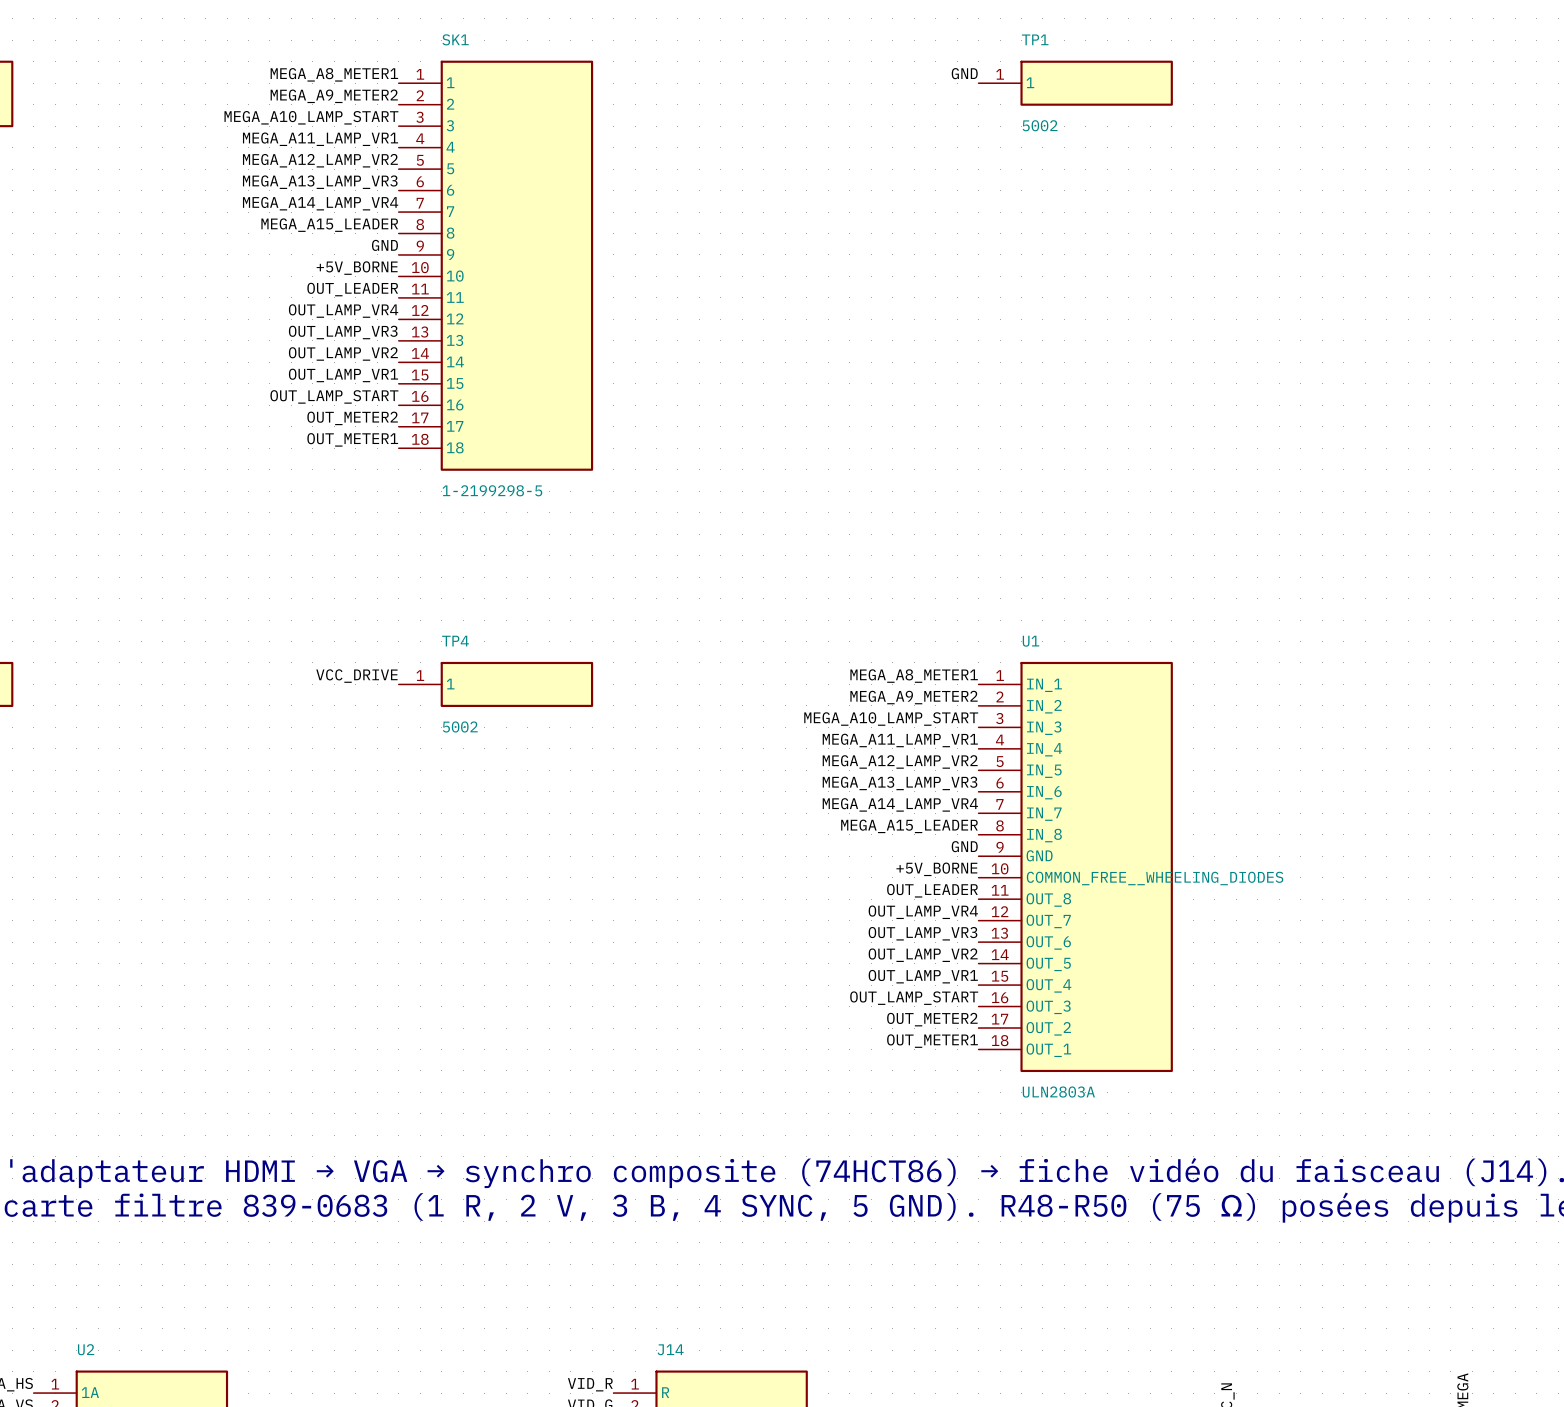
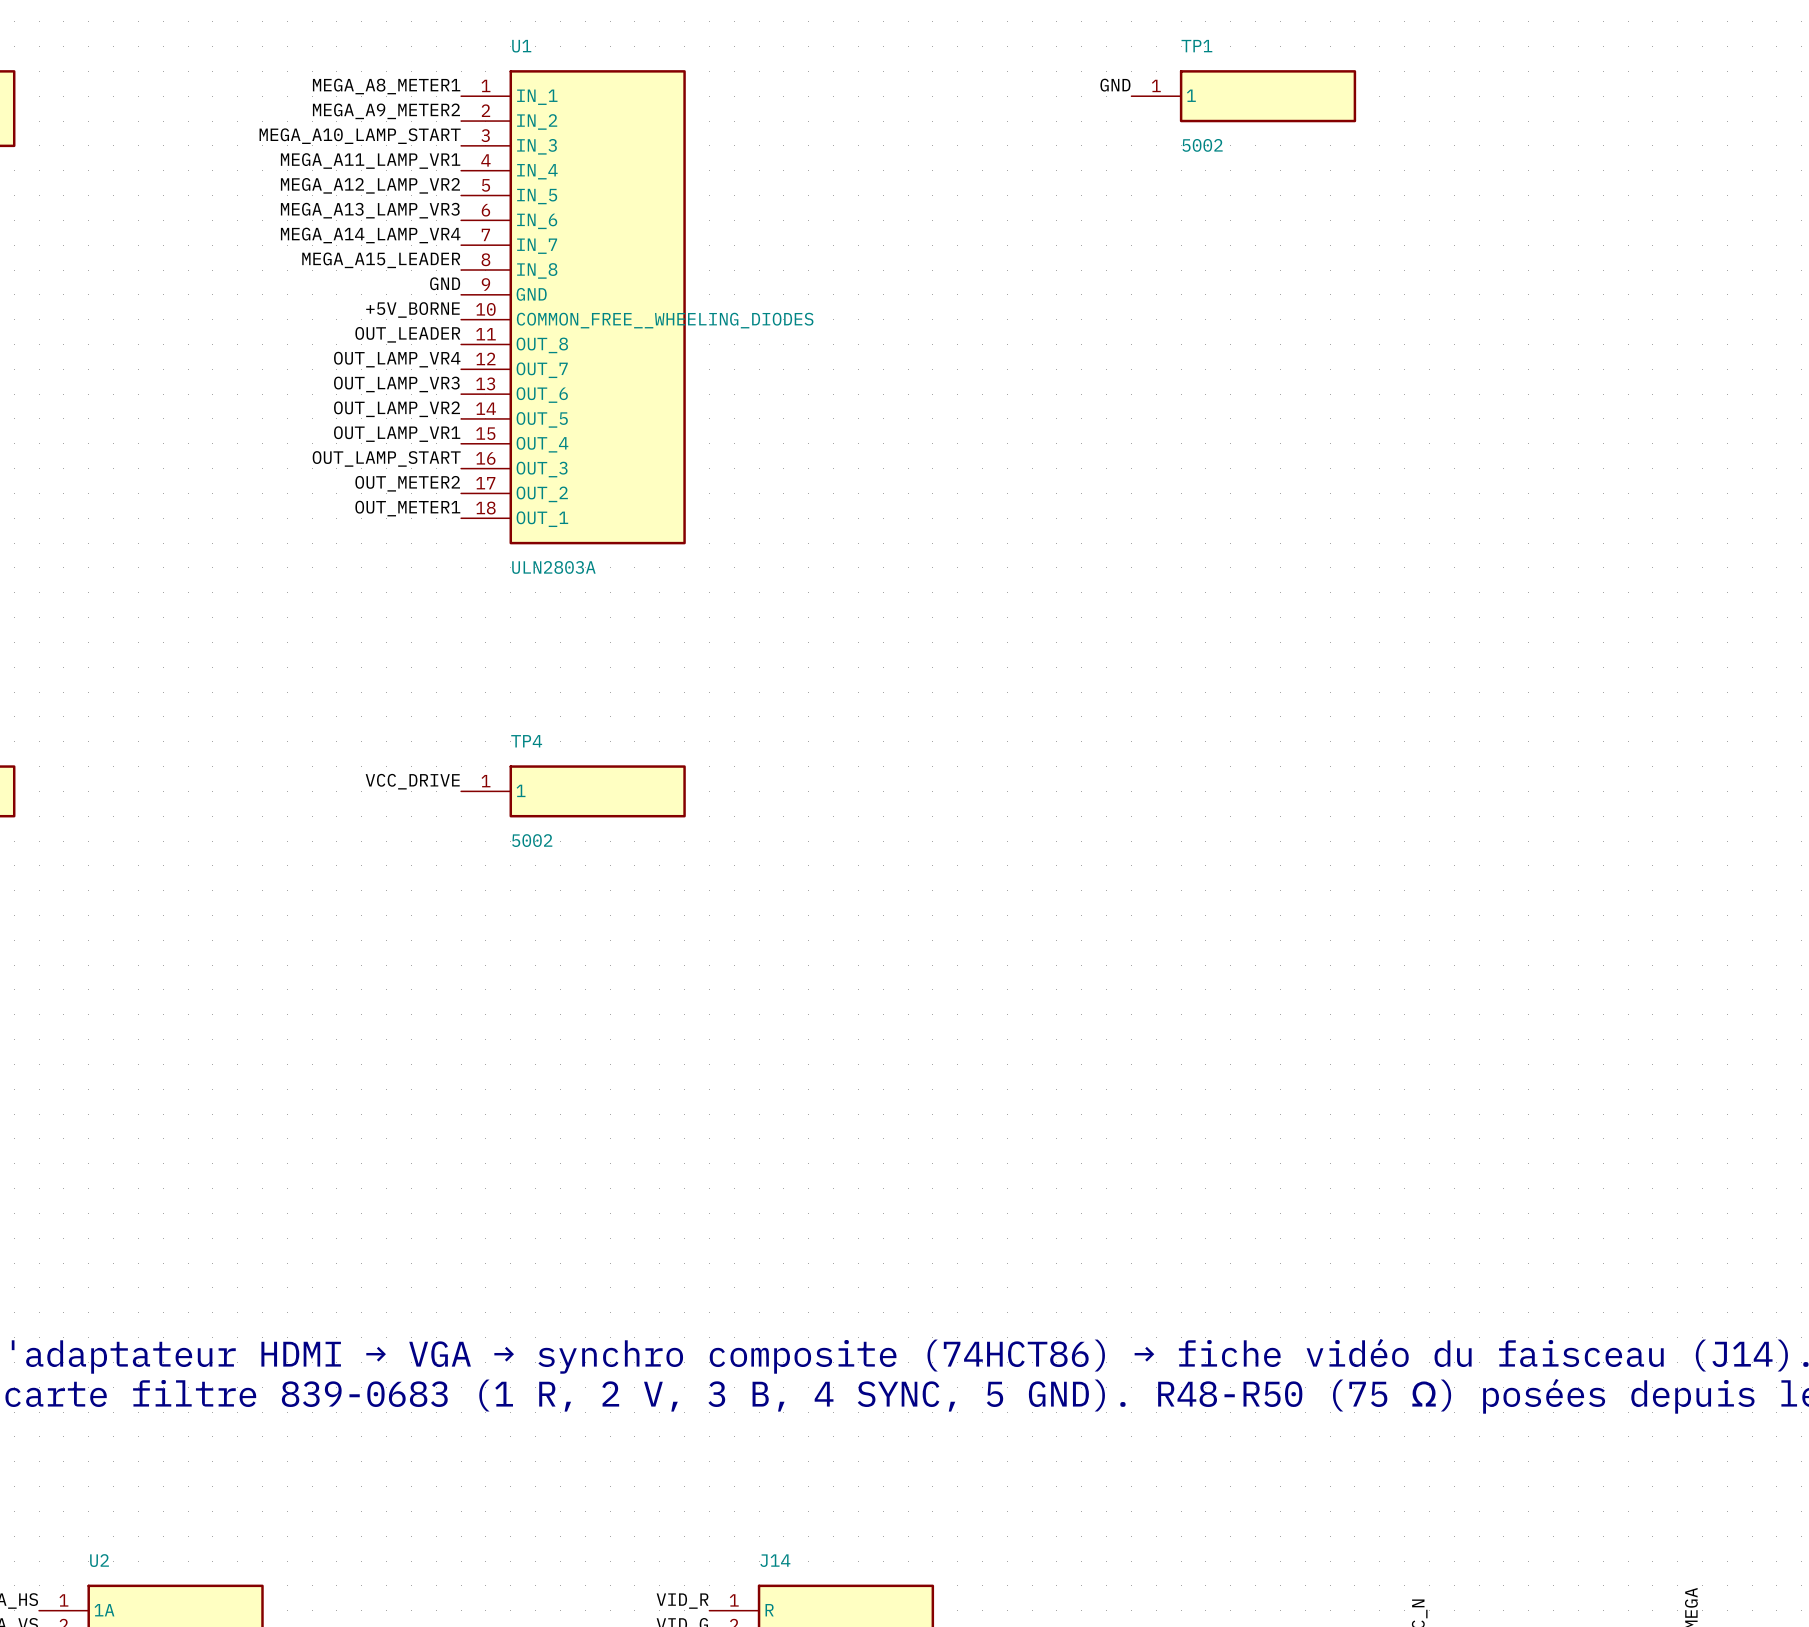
SK1: 1-2199298-5 (495, 265) -> none
label: MEGA_A8_METER1 (914, 676) -> none
label: MEGA_A9_METER2 (914, 697) -> none
label: MEGA_A10_LAMP_START (891, 719) -> none
label: MEGA_A11_LAMP_VR1 (900, 740) -> none
label: MEGA_A12_LAMP_VR2 (900, 761) -> none
label: MEGA_A13_LAMP_VR3 (900, 783) -> none
label: MEGA_A14_LAMP_VR4 (900, 804) -> none
label: MEGA_A15_LEADER (909, 826) -> none
label: GND (964, 846) -> none
U1 position: (1075, 866) -> (573, 307)
label: +5V_BORNE (936, 869) -> none
label: OUT_LEADER (932, 890) -> none
label: OUT_LAMP_VR4 (923, 912) -> none
label: OUT_LAMP_VR3 (922, 933) -> none
label: OUT_LAMP_VR2 (923, 955) -> none
label: OUT_LAMP_VR1 (923, 976) -> none
label: OUT_LAMP_START (914, 998) -> none
label: OUT_METER2 (932, 1019) -> none
label: OUT_METER1 (932, 1041) -> none

